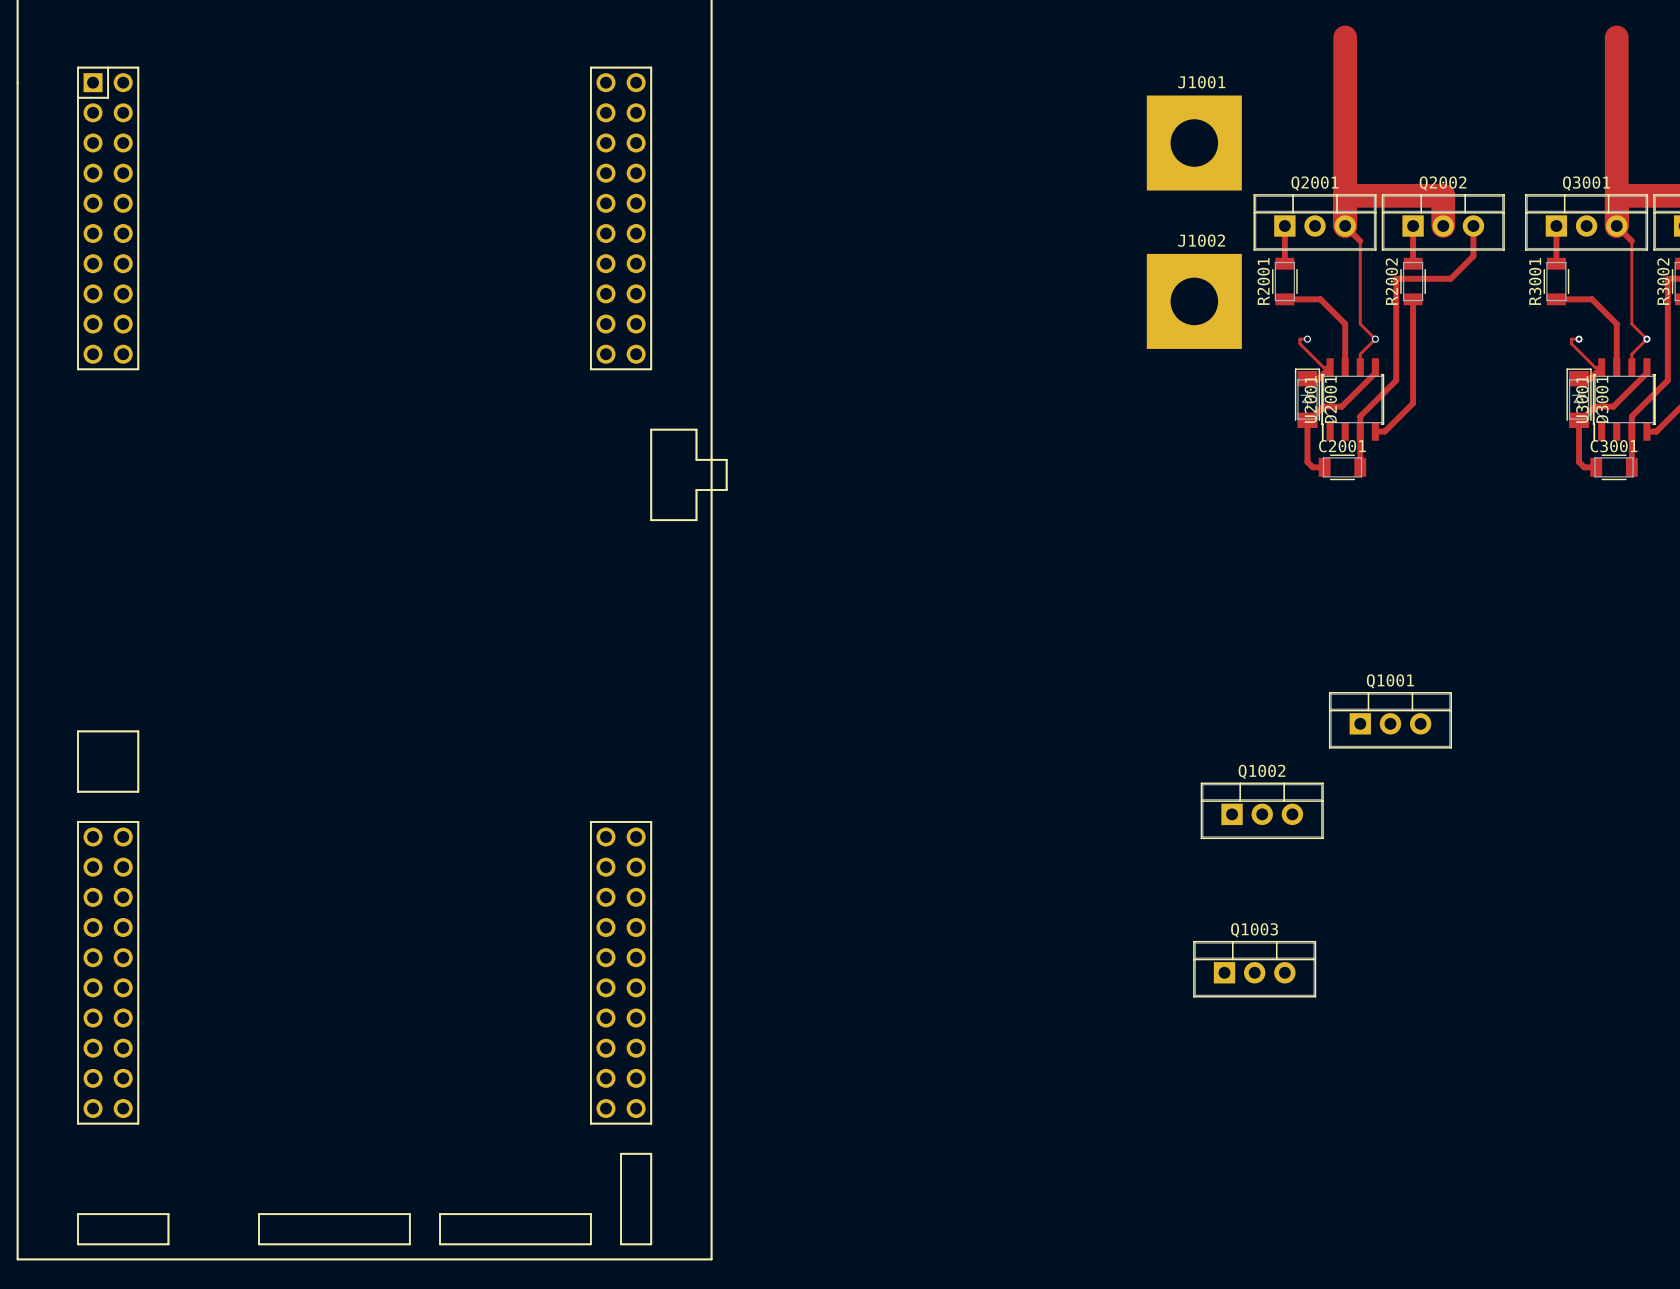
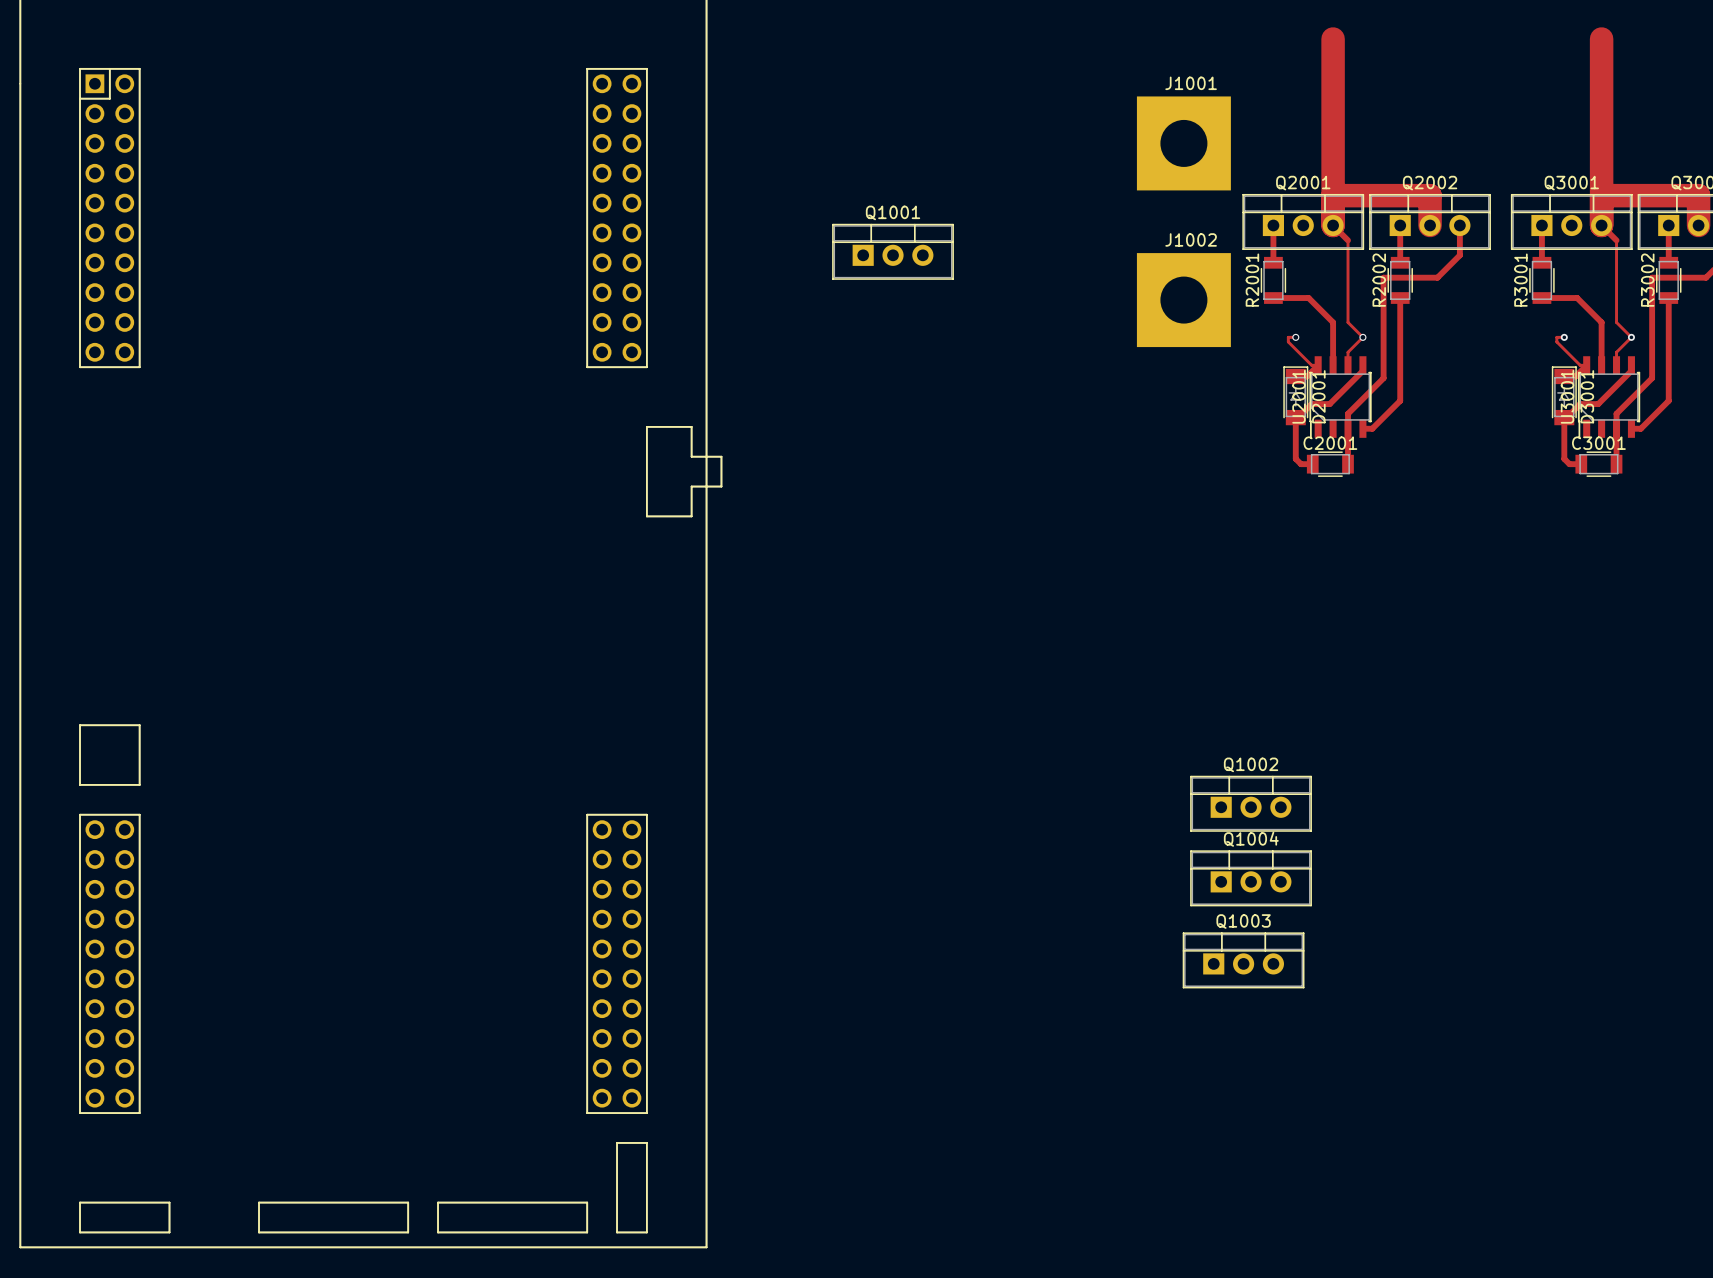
Q1001 position: (1390, 720) -> (893, 251)
Q1004: none -> (1251, 878)

